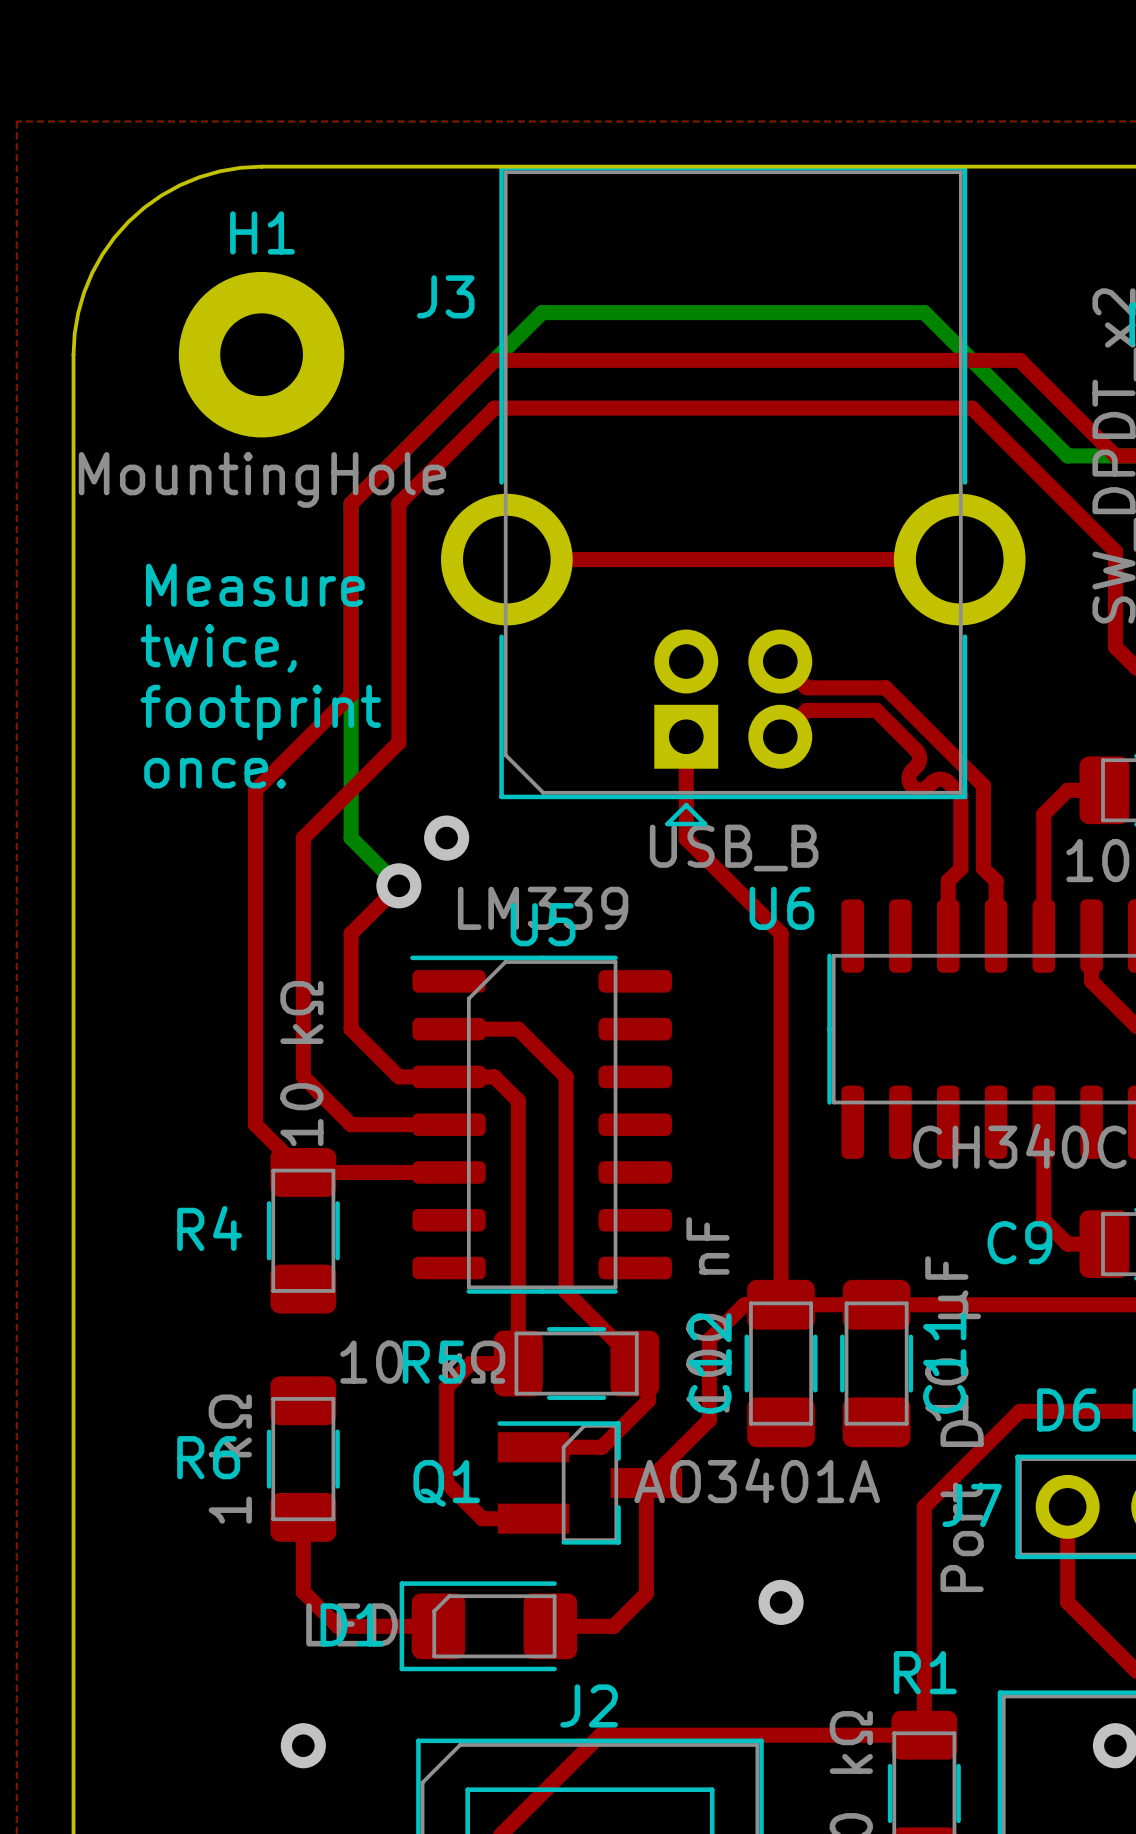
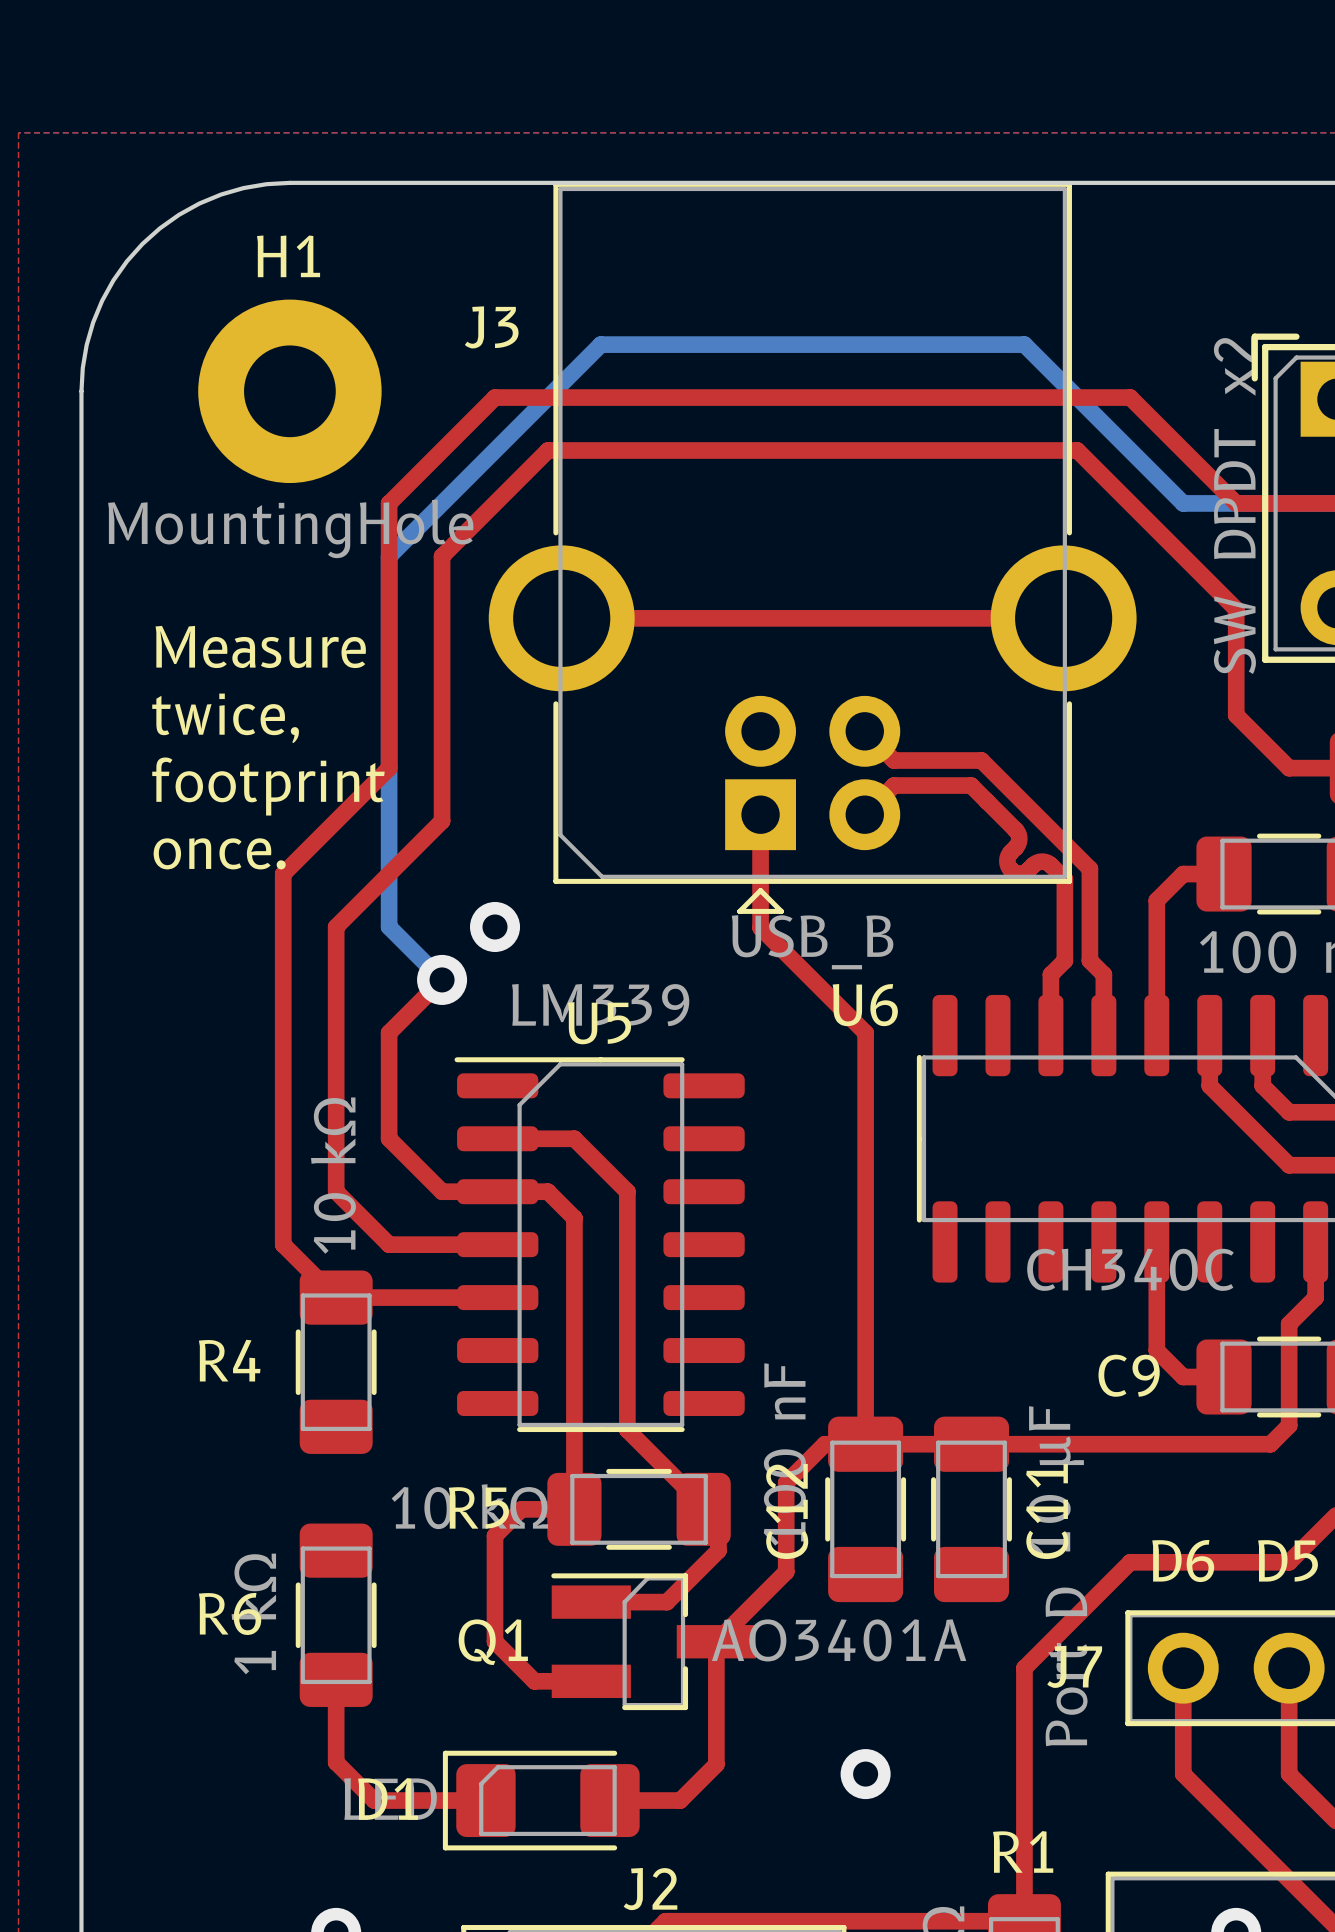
top track: (494, 360) (351, 503) -> (547, 397) (495, 397) (389, 503) (389, 556)

